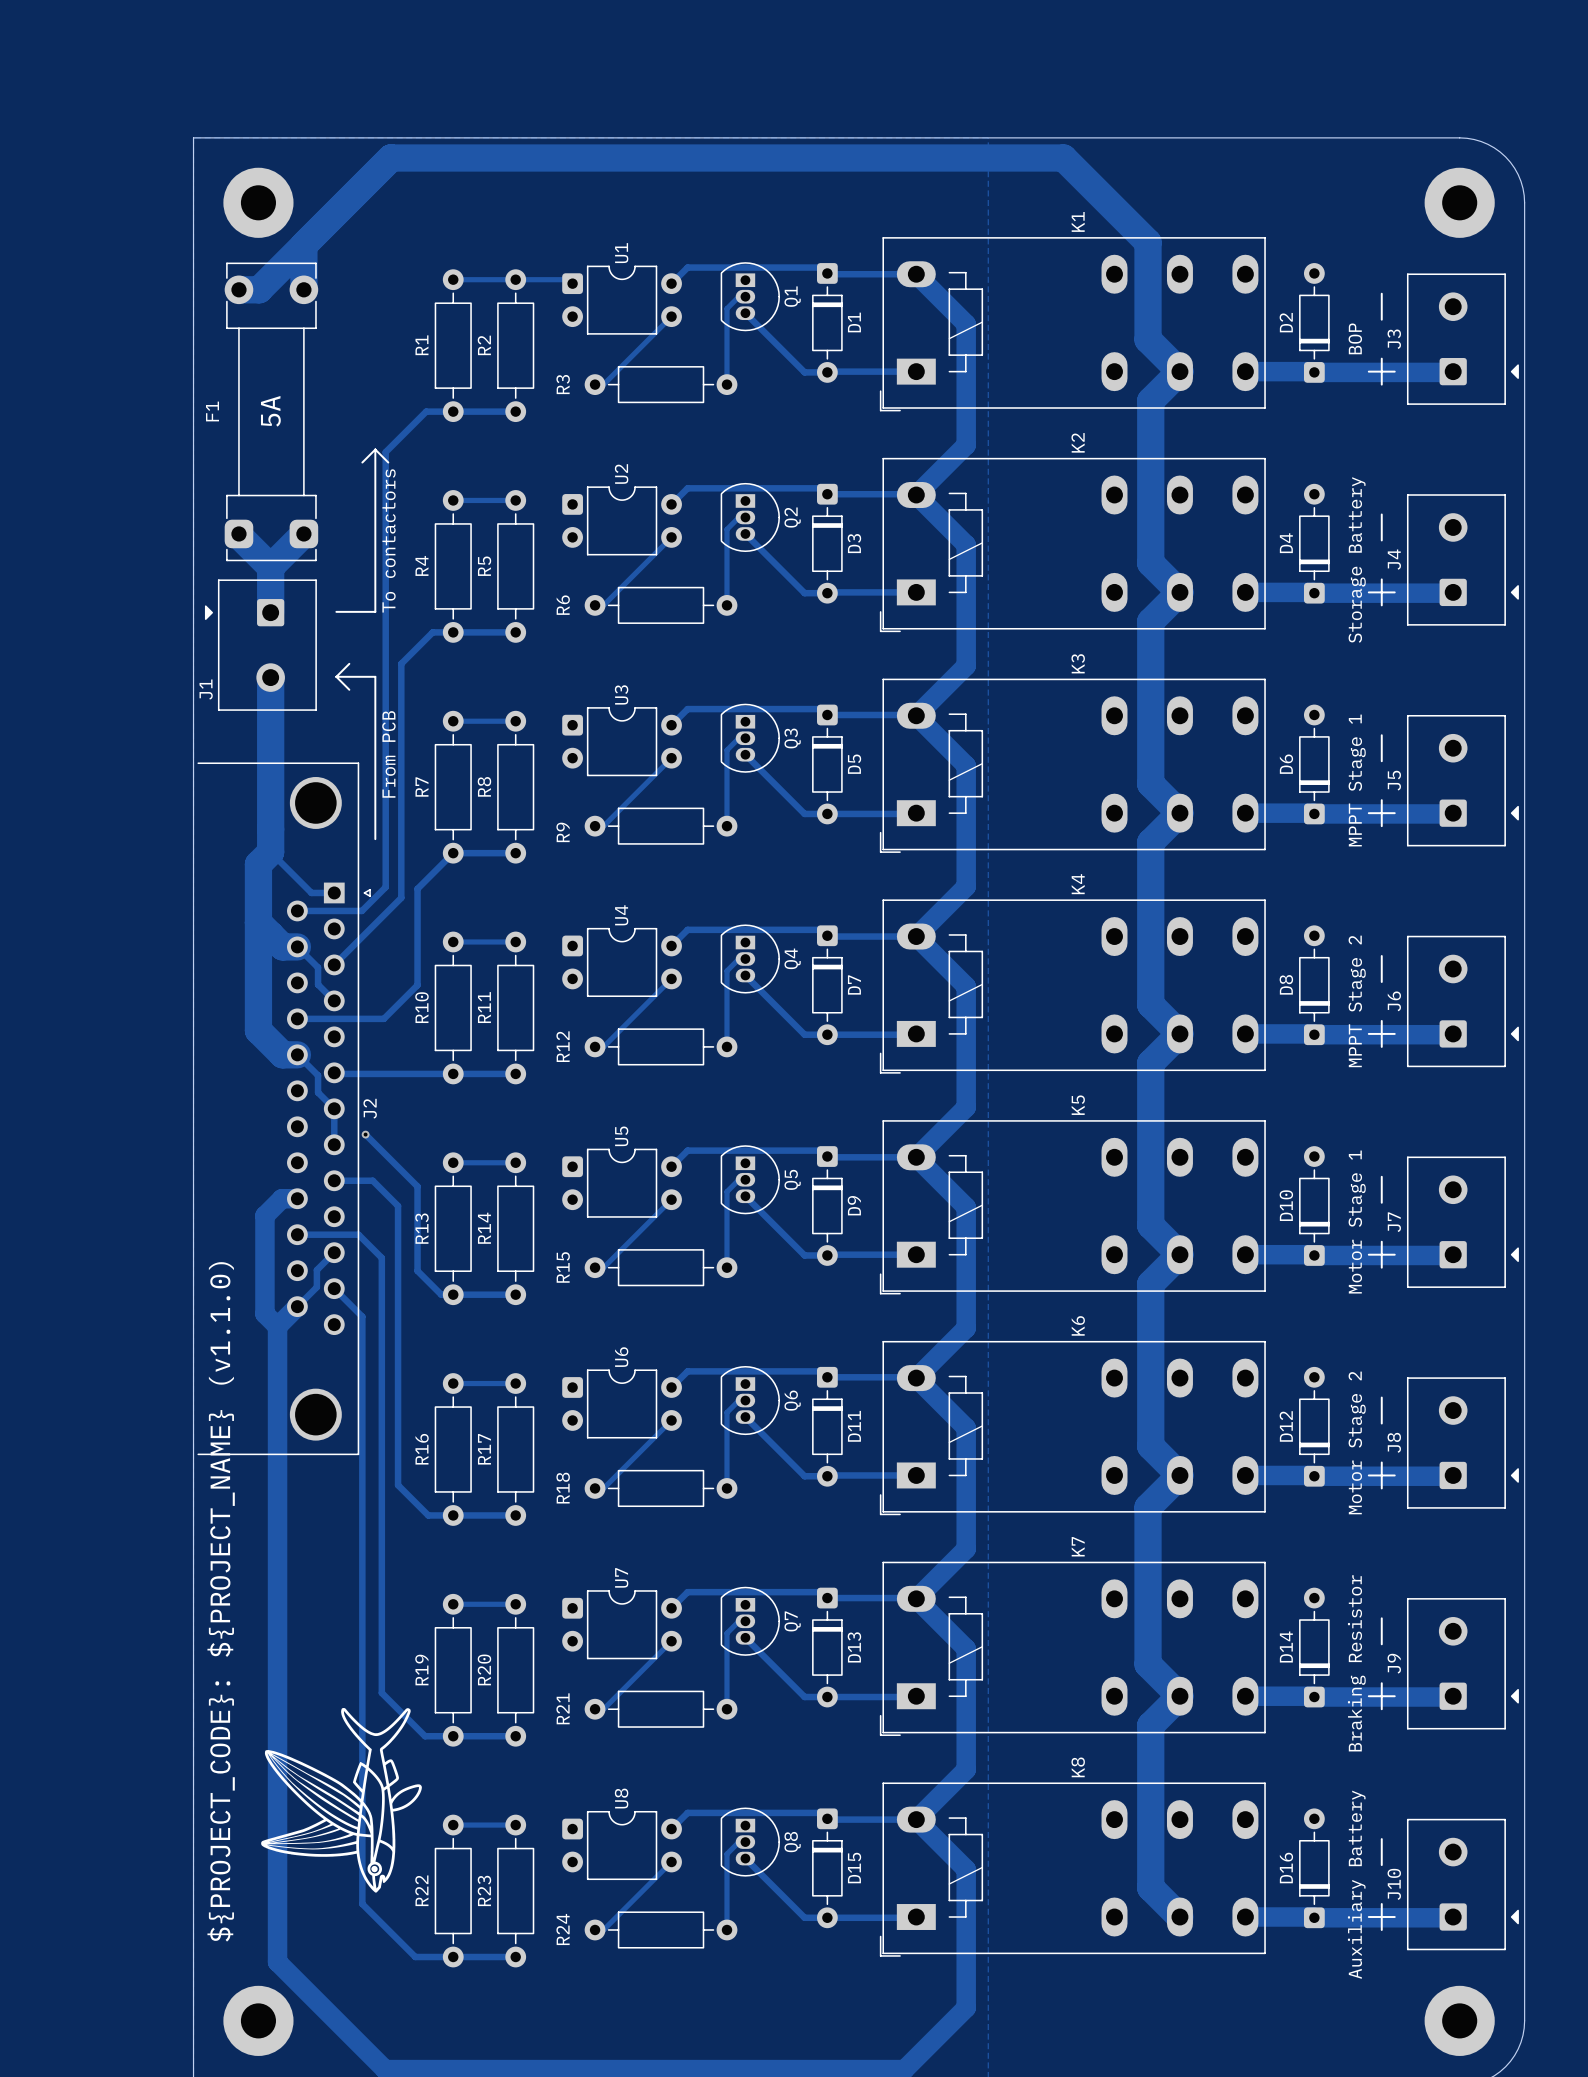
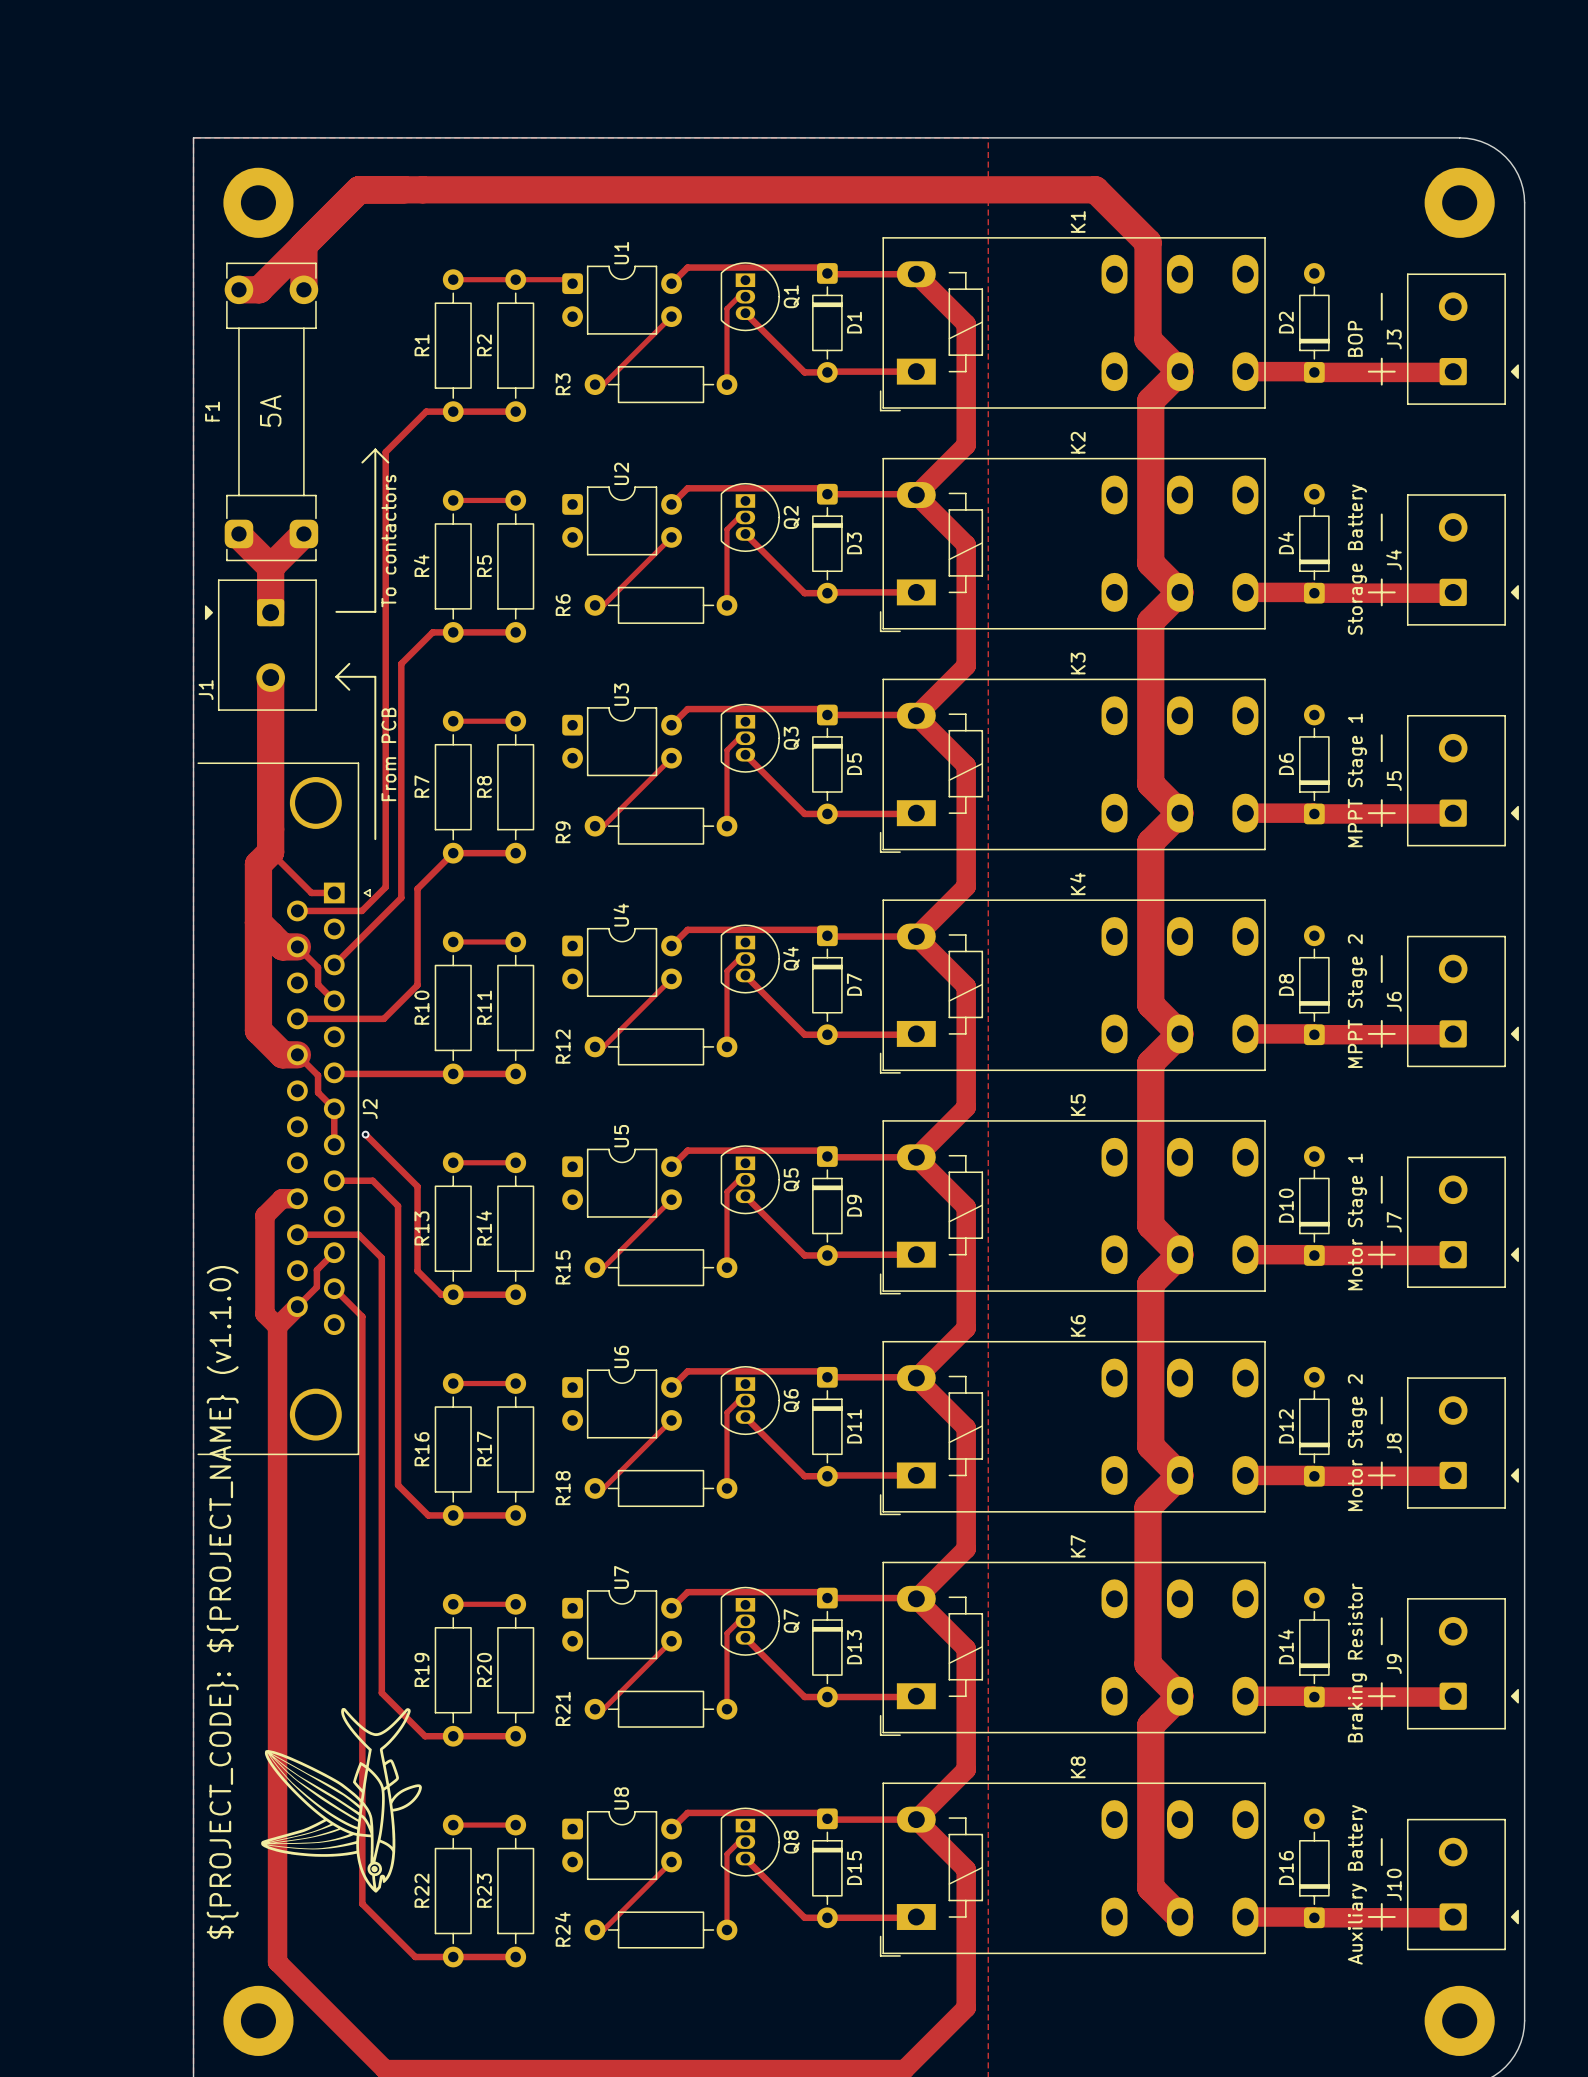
track: (359, 189) (390, 158) (1063, 158) (1095, 189) -> (359, 189) (1095, 189)

